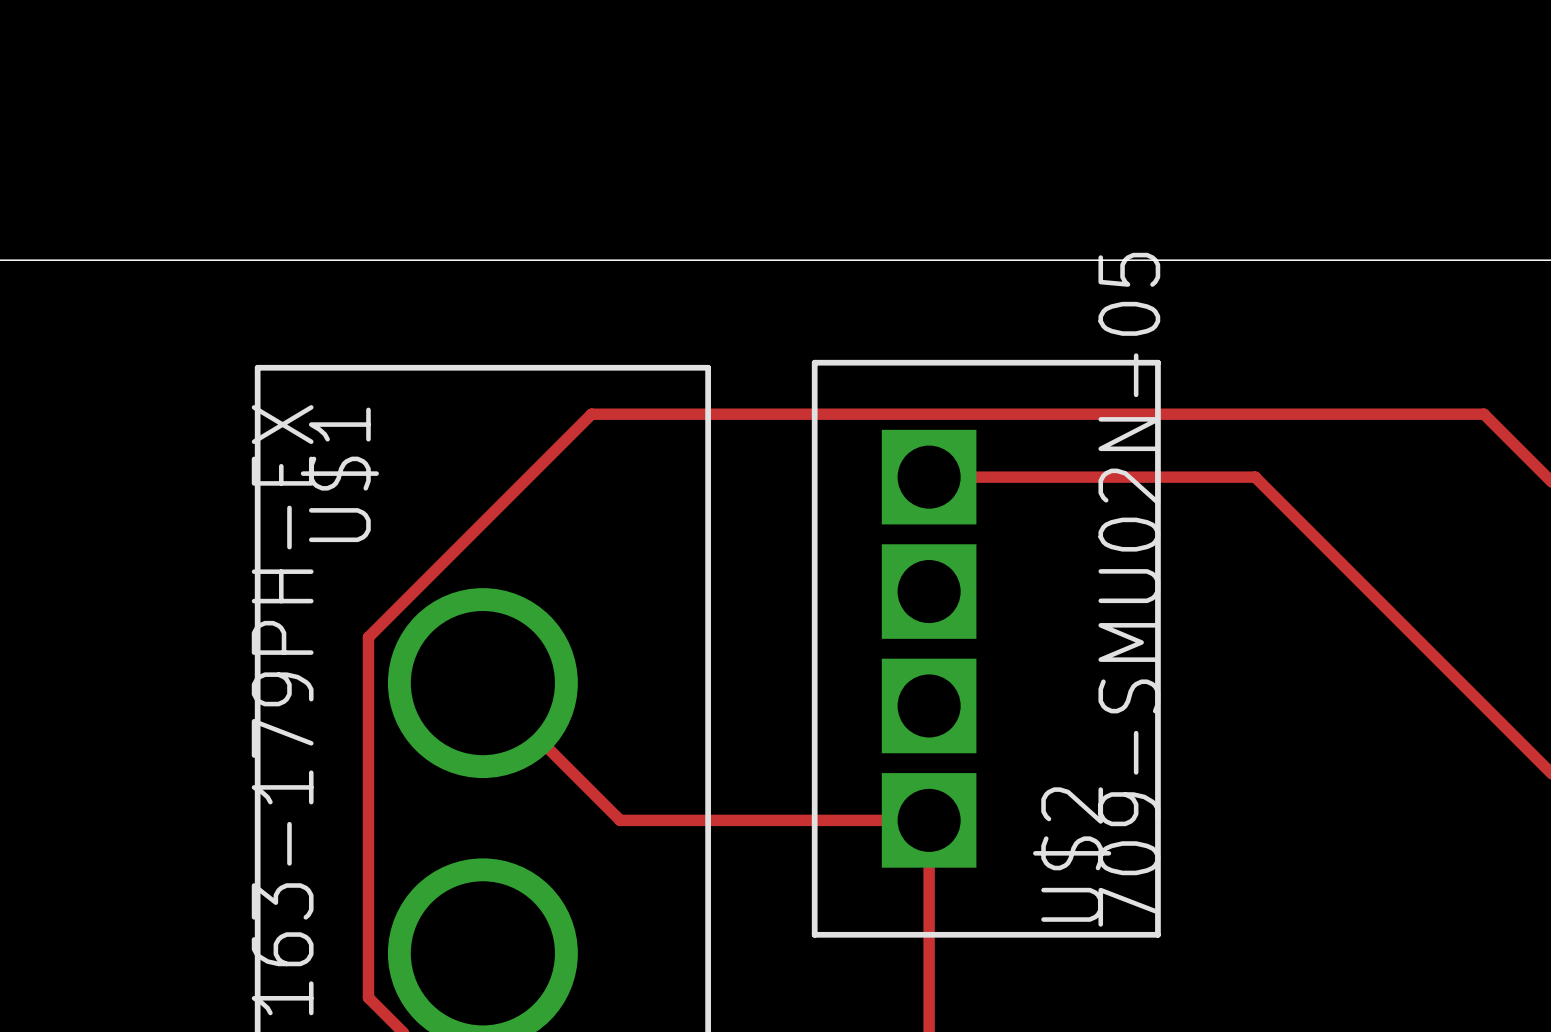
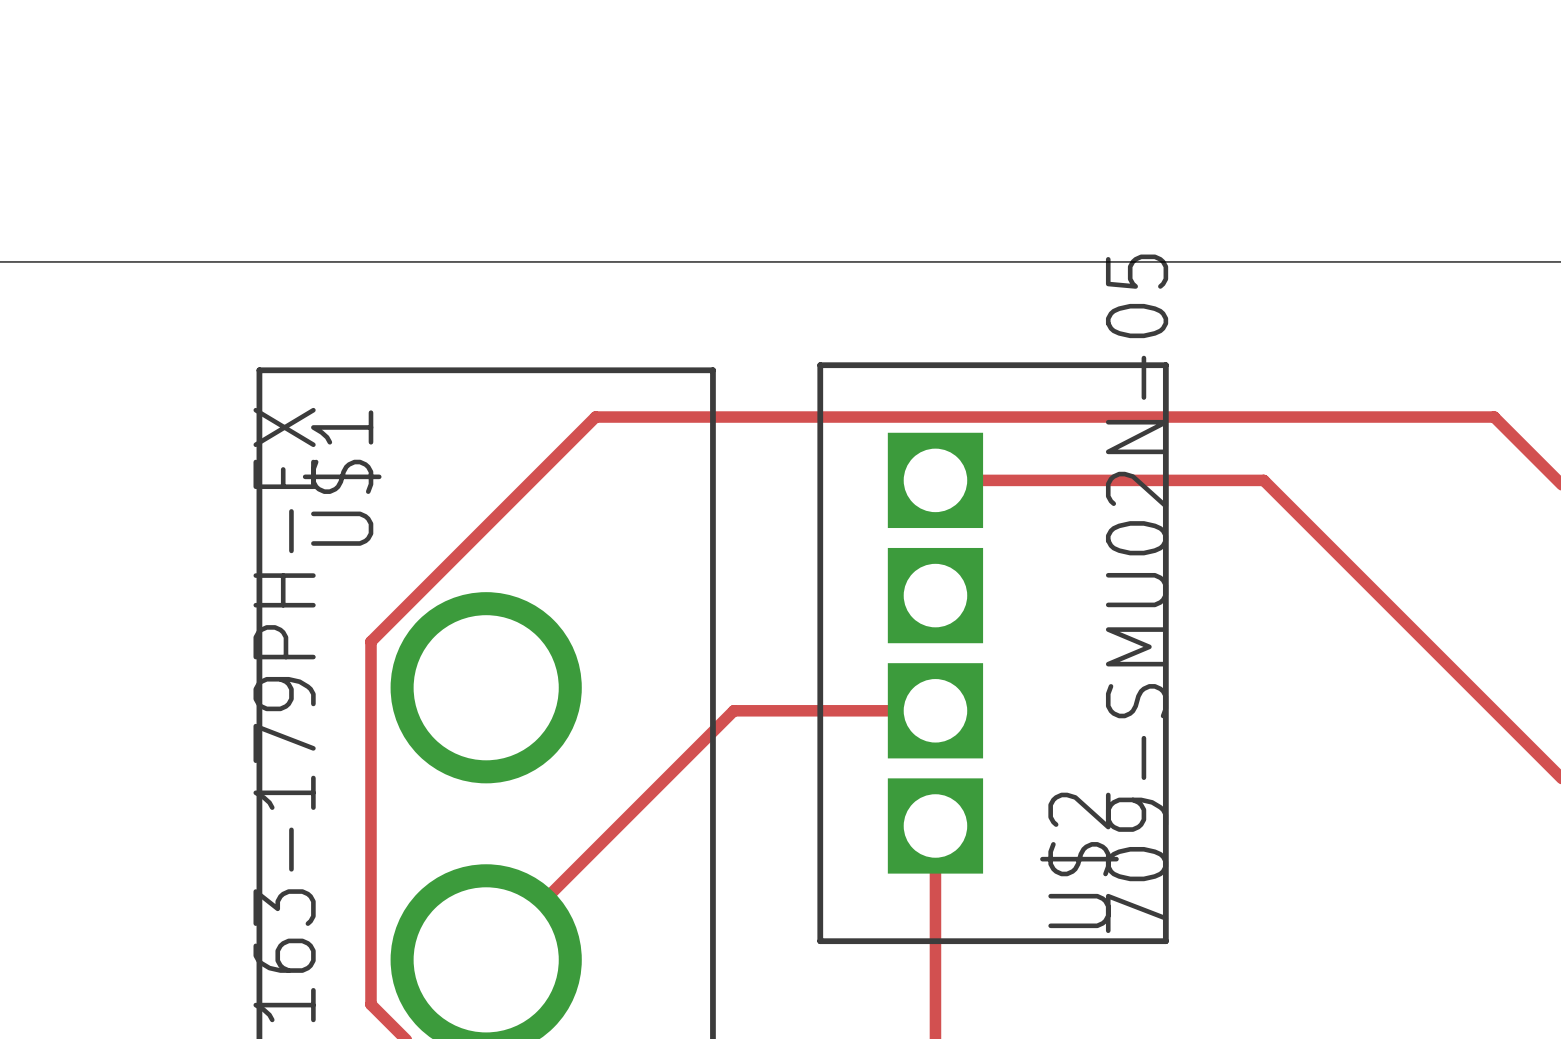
track: (482, 683) (620, 820) (929, 820) -> none
track: none -> (935, 710) (733, 710) (486, 959)

